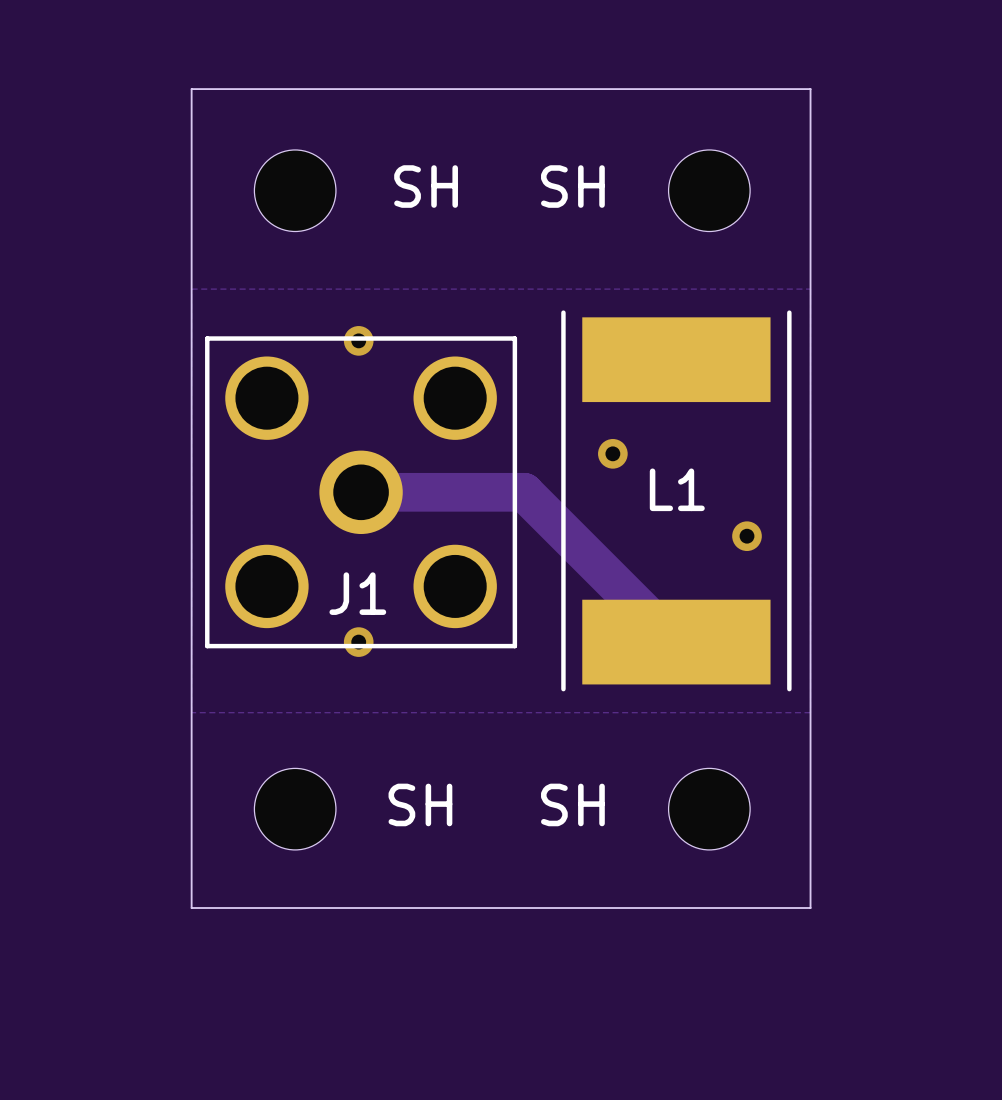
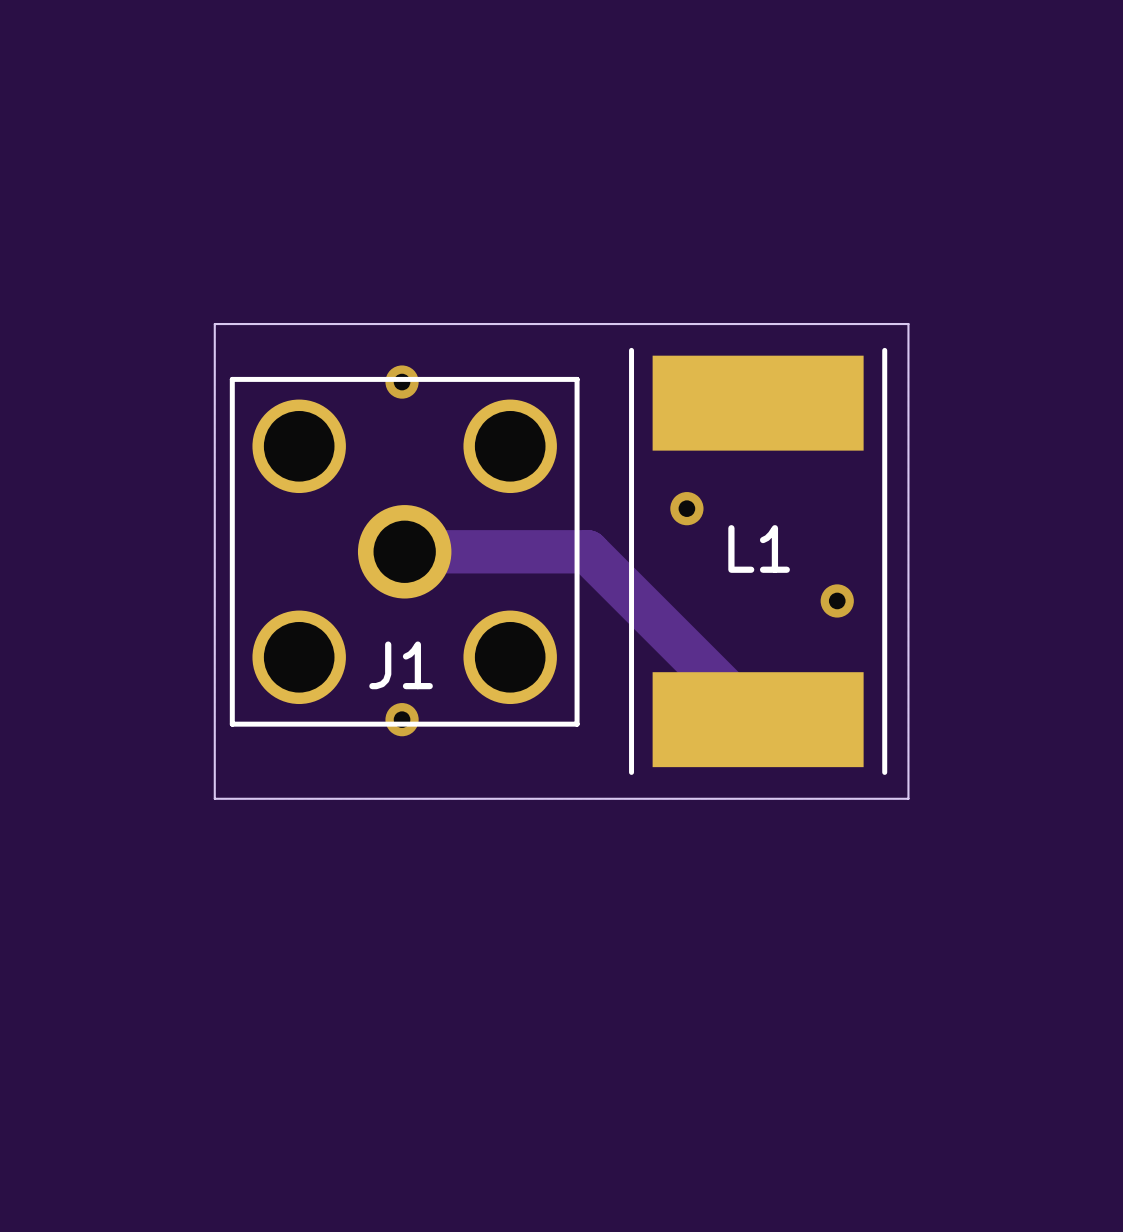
SH: (295, 190) -> none
SH: (709, 190) -> none
board edge: (191, 289) (191, 89) (810, 89) (810, 289) -> (214, 324) (908, 324)
board edge: (191, 712) (191, 908) (810, 908) (810, 712) -> (214, 798) (908, 798)
SH: (295, 809) -> none
SH: (709, 809) -> none

